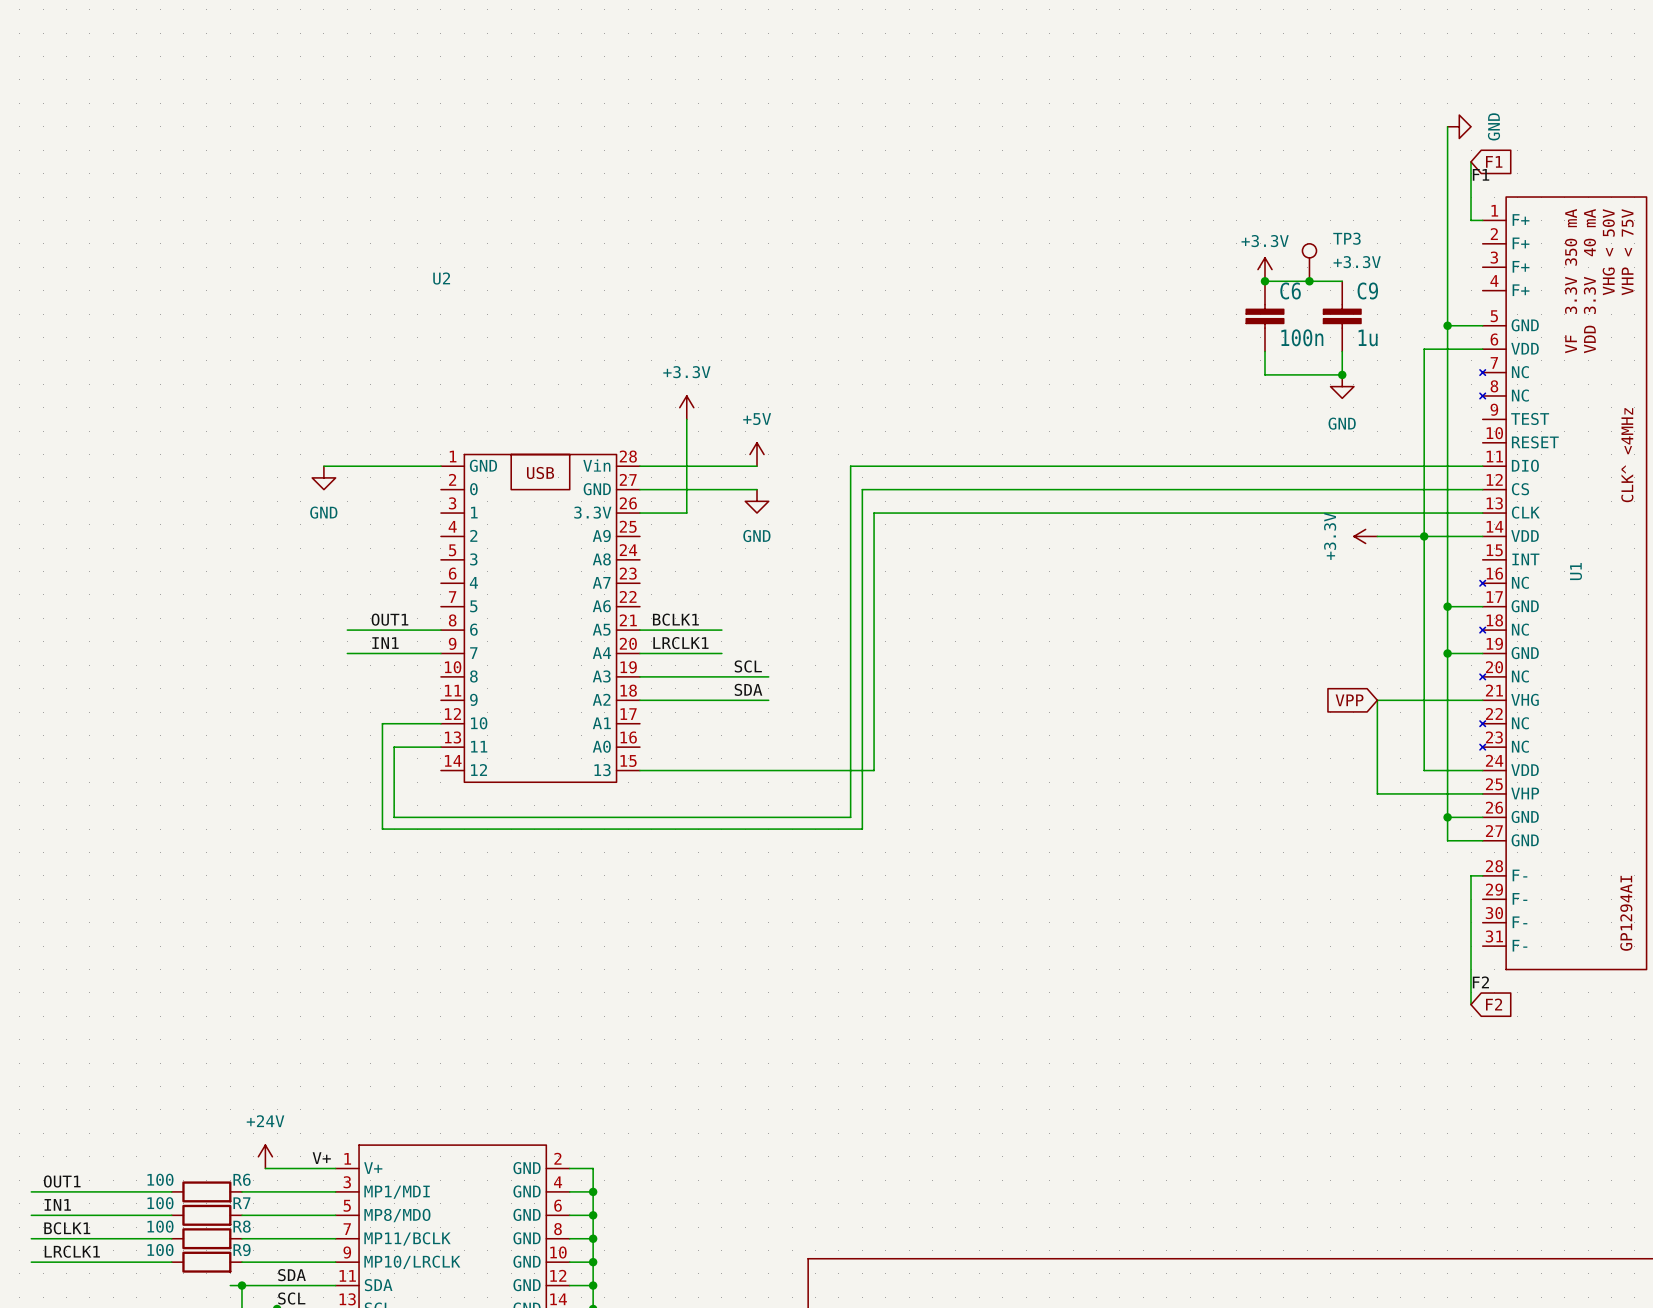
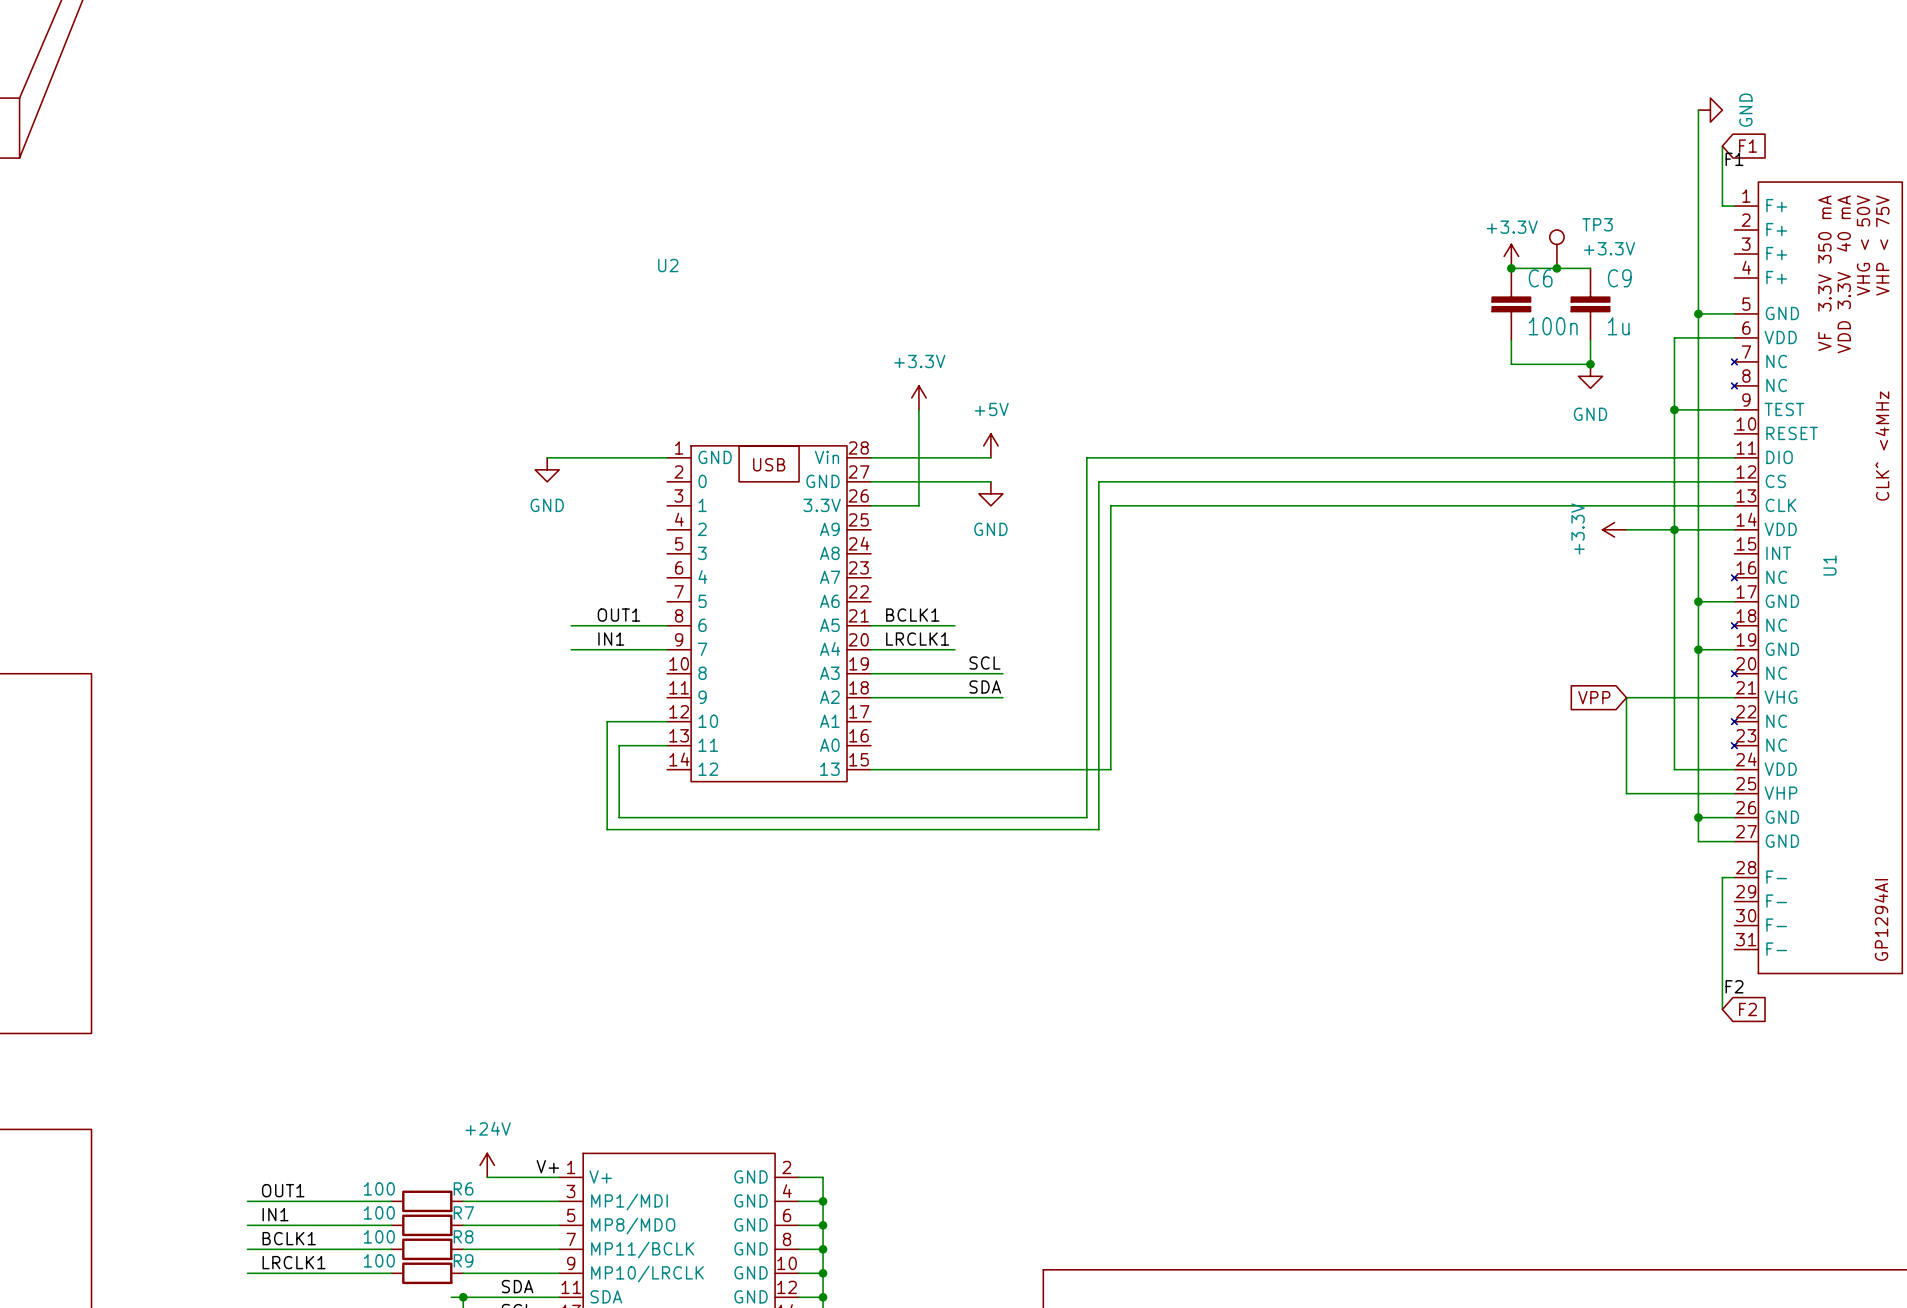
wire: none -> (1674, 409) (1734, 409)
junction: none -> (1674, 409)

